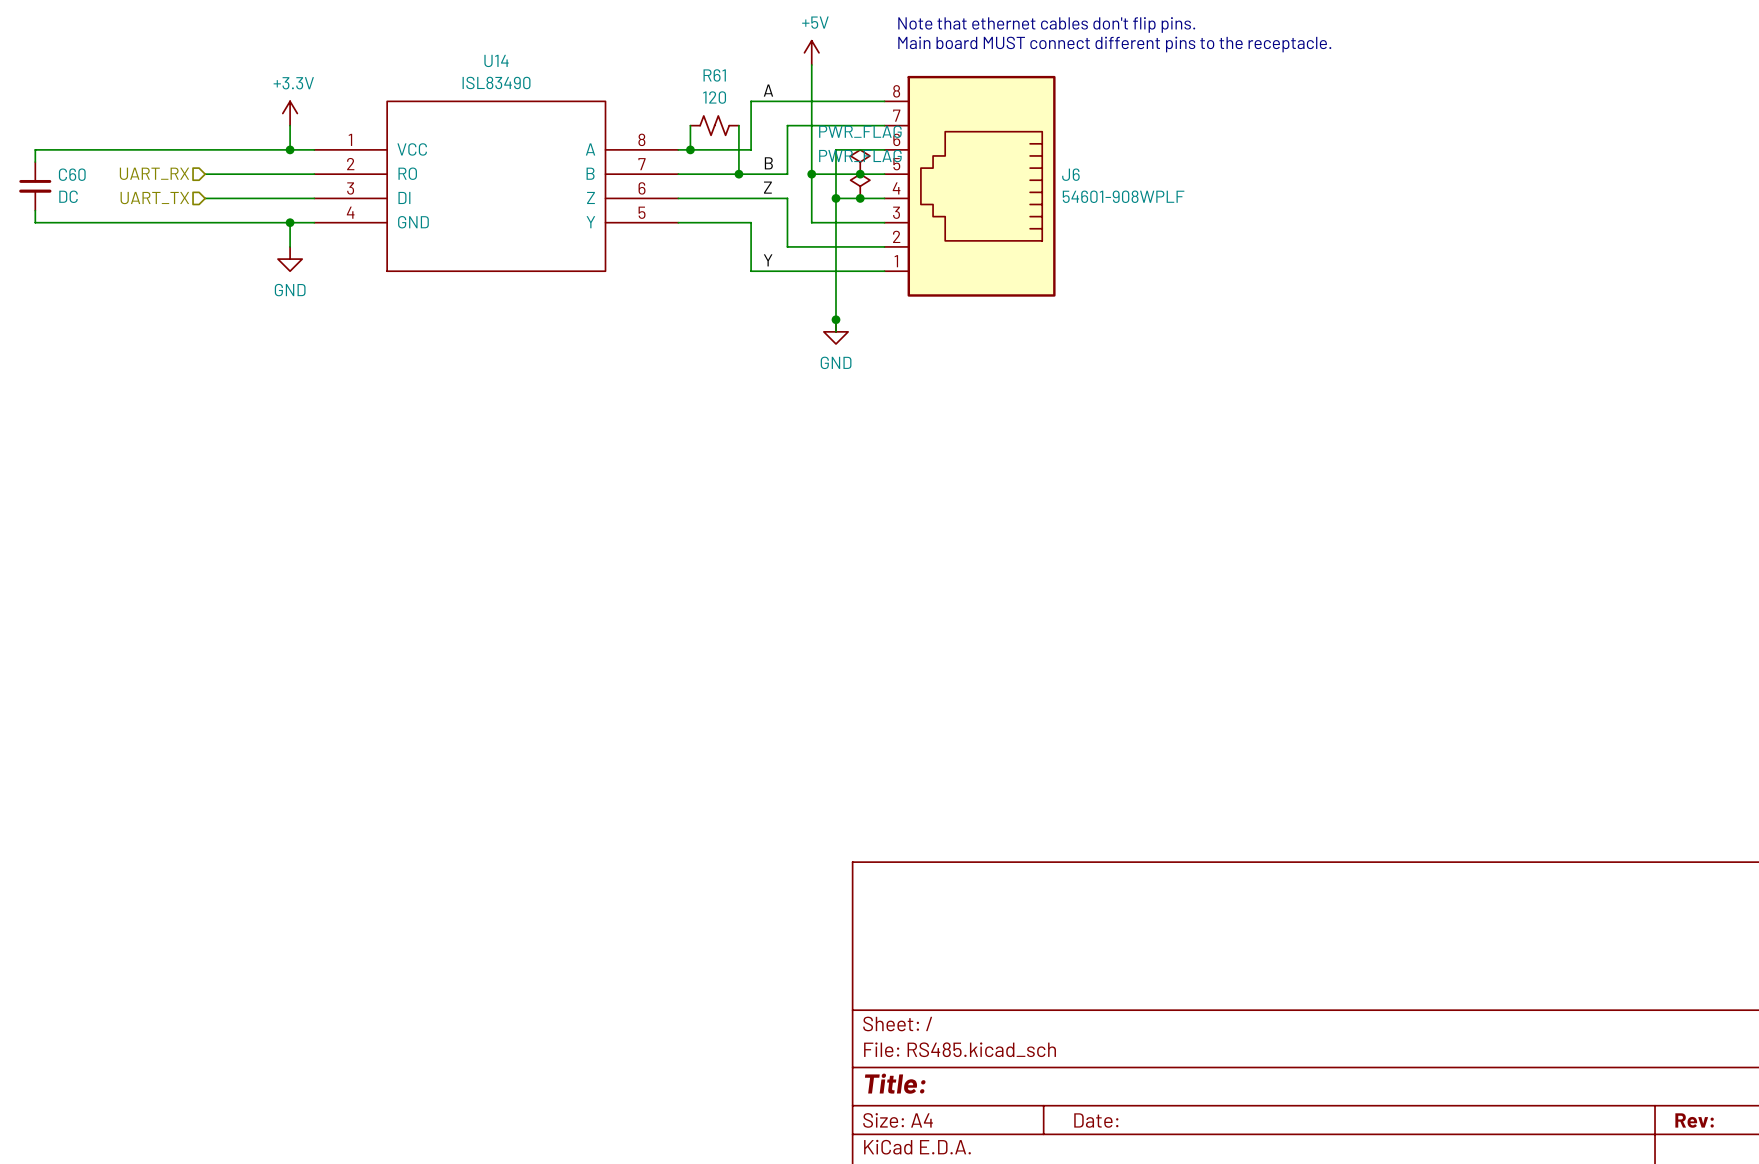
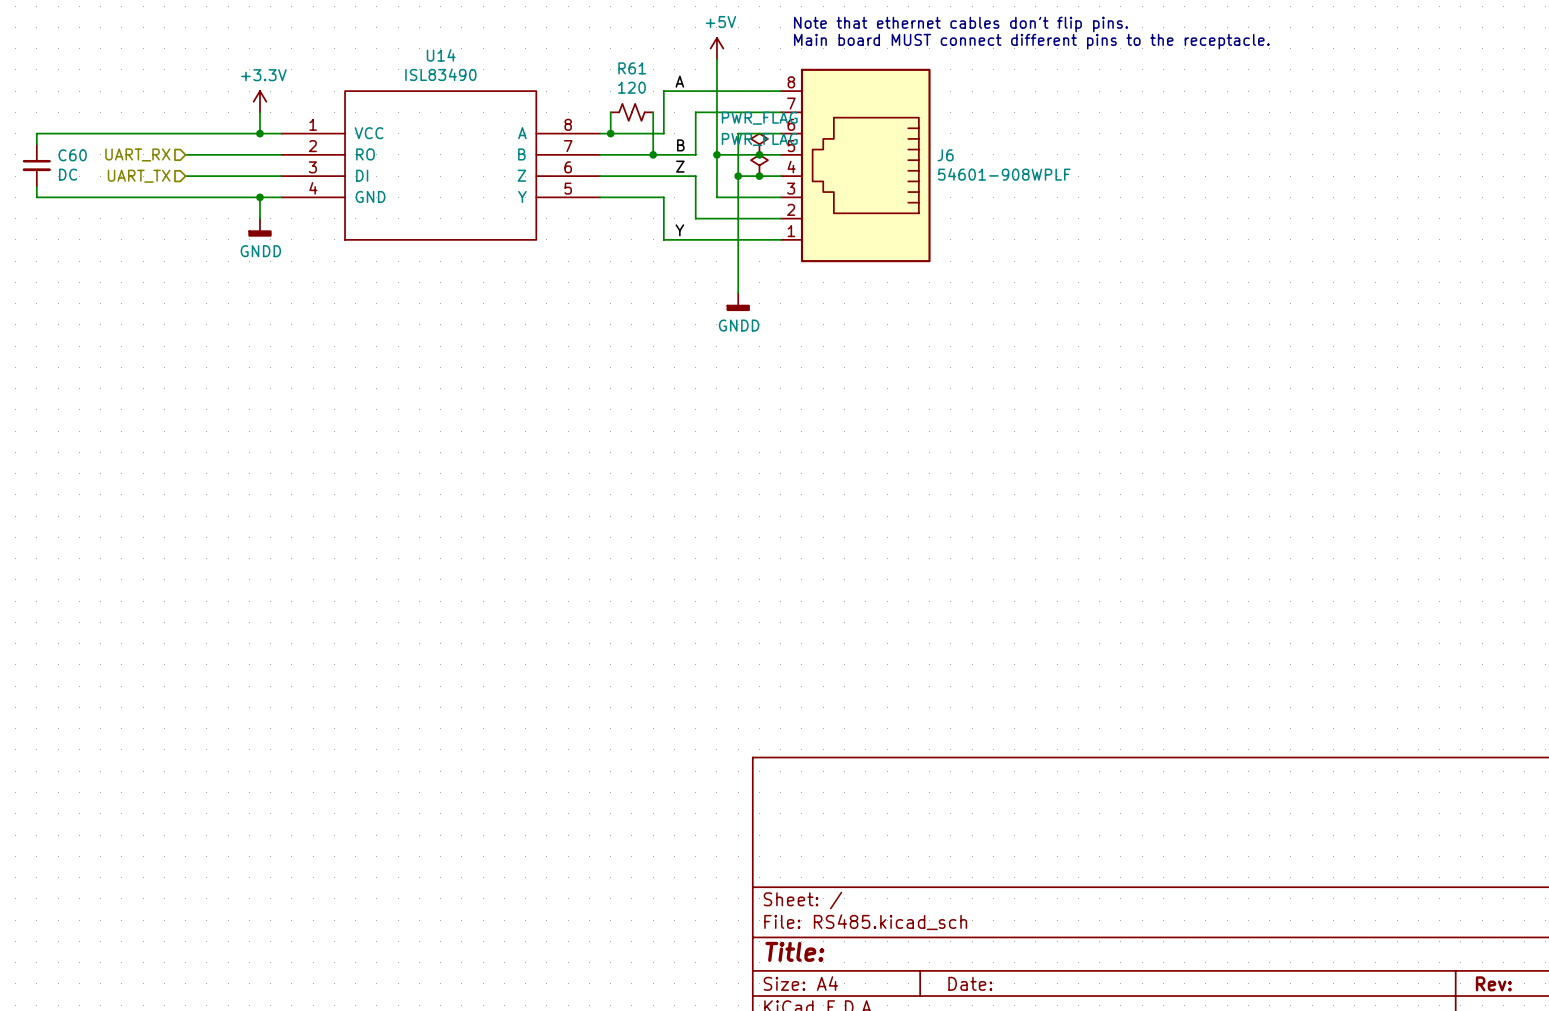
power symbol: GND (290, 259) -> GNDD (259, 227)
junction: (836, 319) -> none
power symbol: GND (836, 331) -> none
power symbol: none -> GNDD (738, 302)

